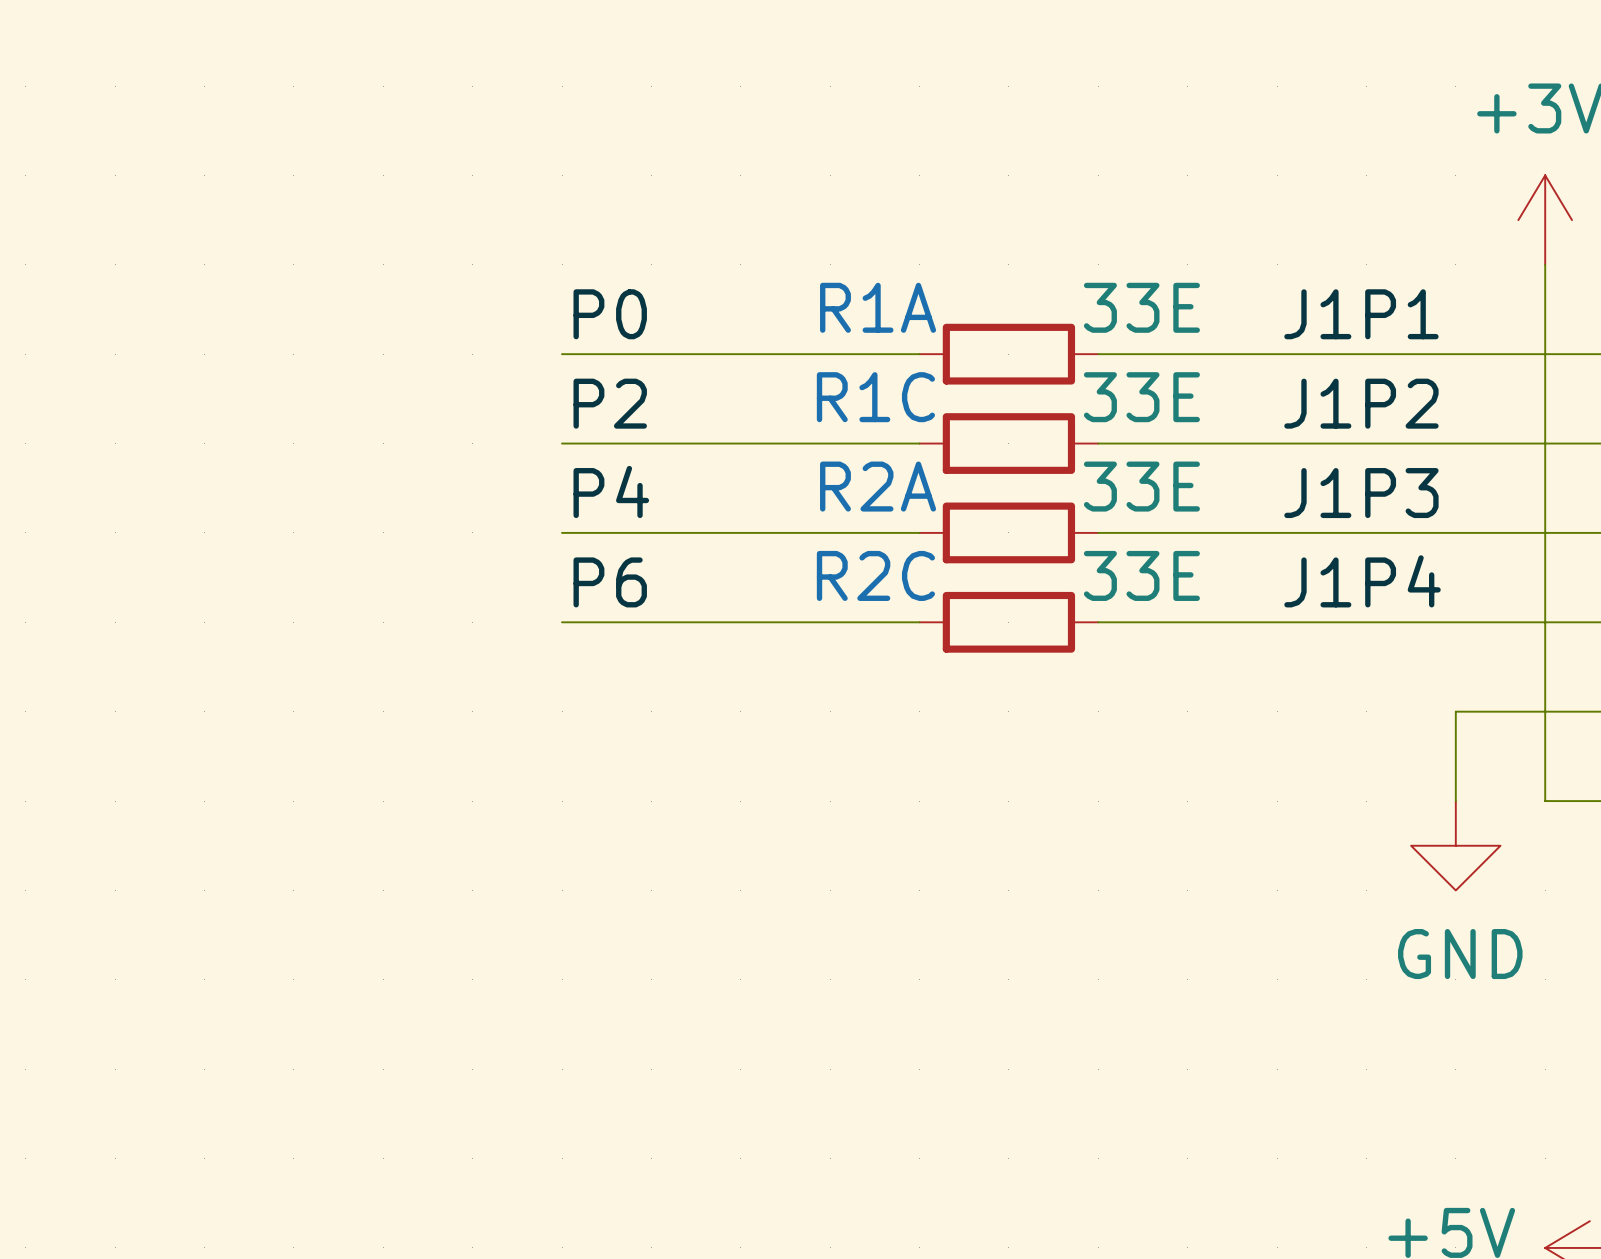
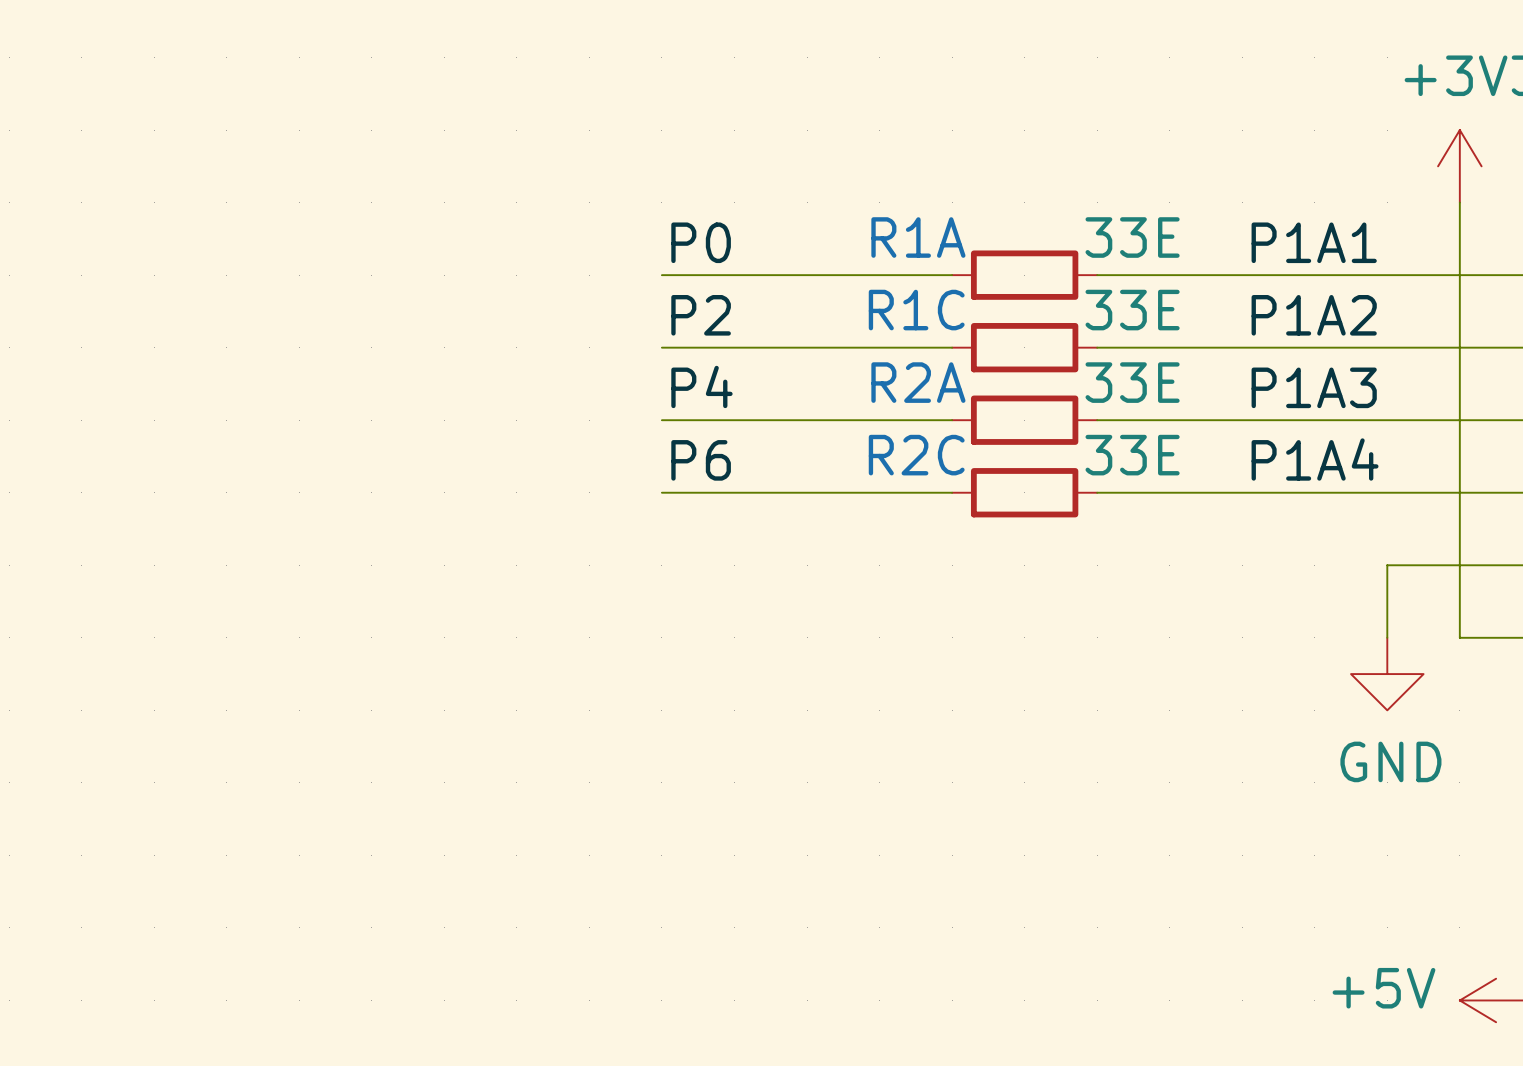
label: J1P1 (1361, 314) -> P1A1 (1314, 242)
label: J1P2 (1361, 403) -> P1A2 (1314, 315)
label: J1P3 (1361, 493) -> P1A3 (1314, 387)
label: J1P4 (1362, 581) -> P1A4 (1315, 459)

